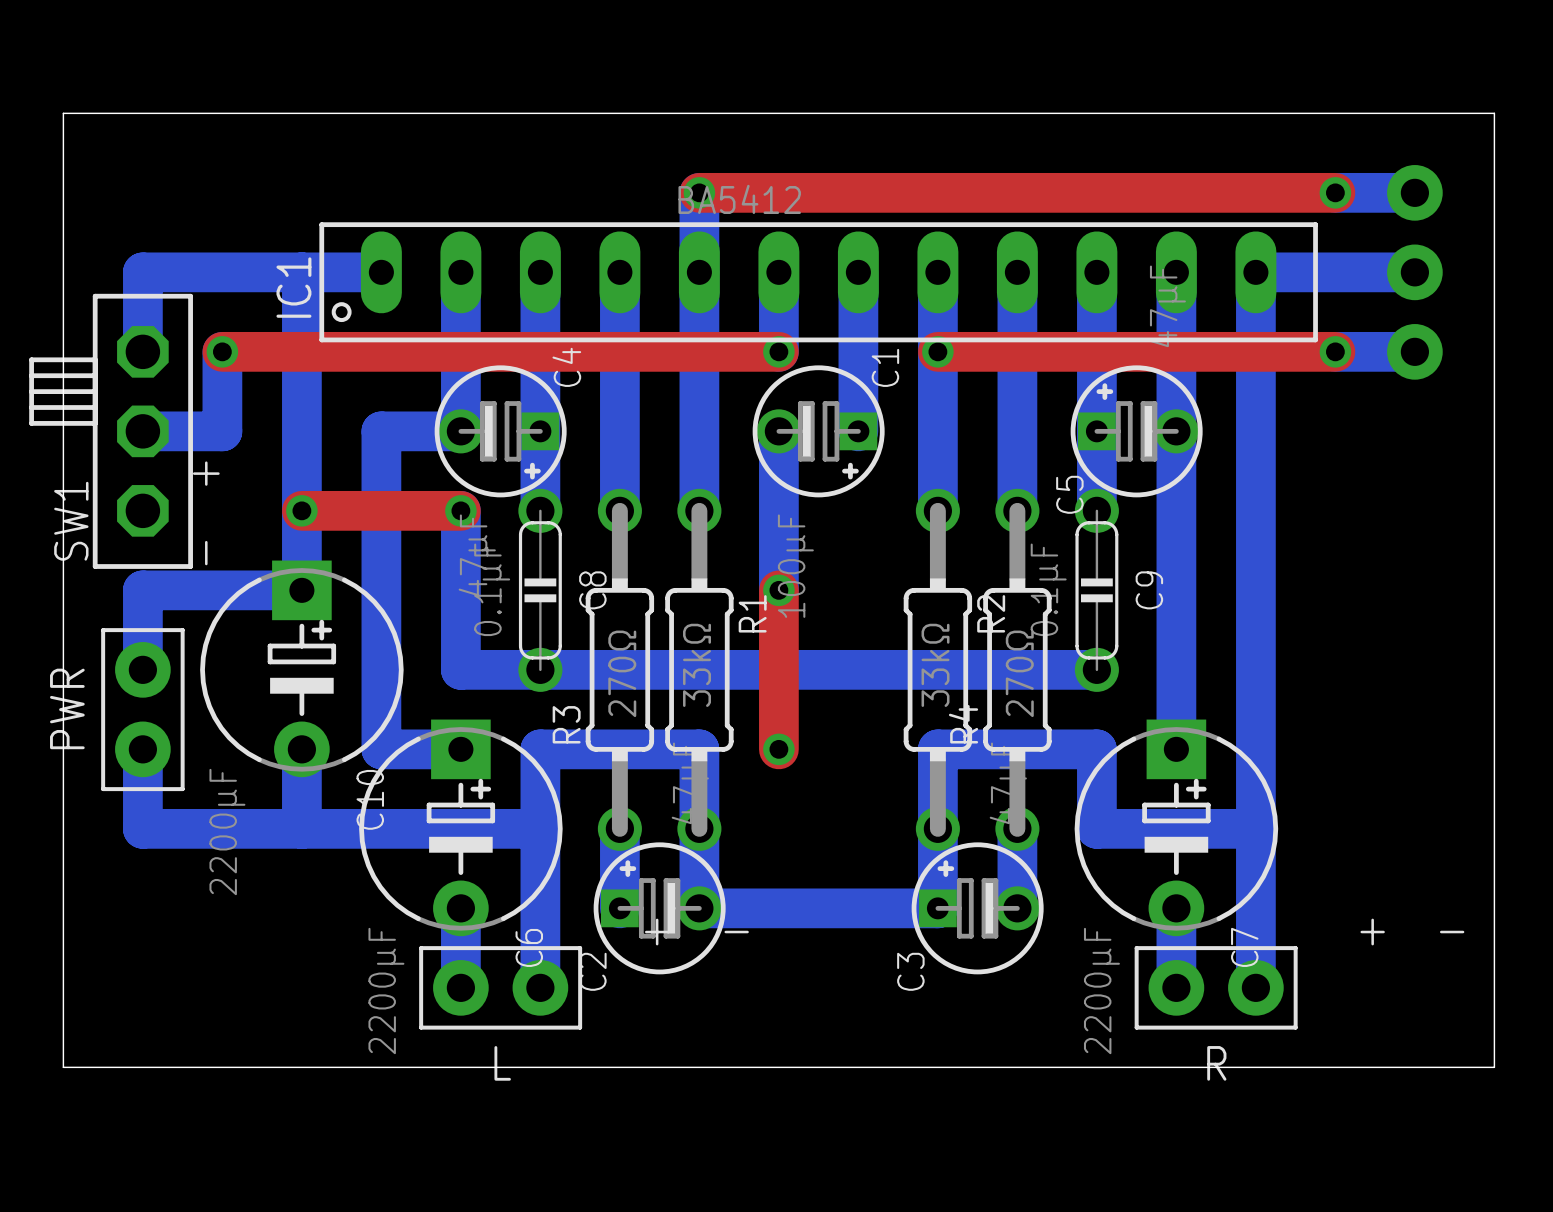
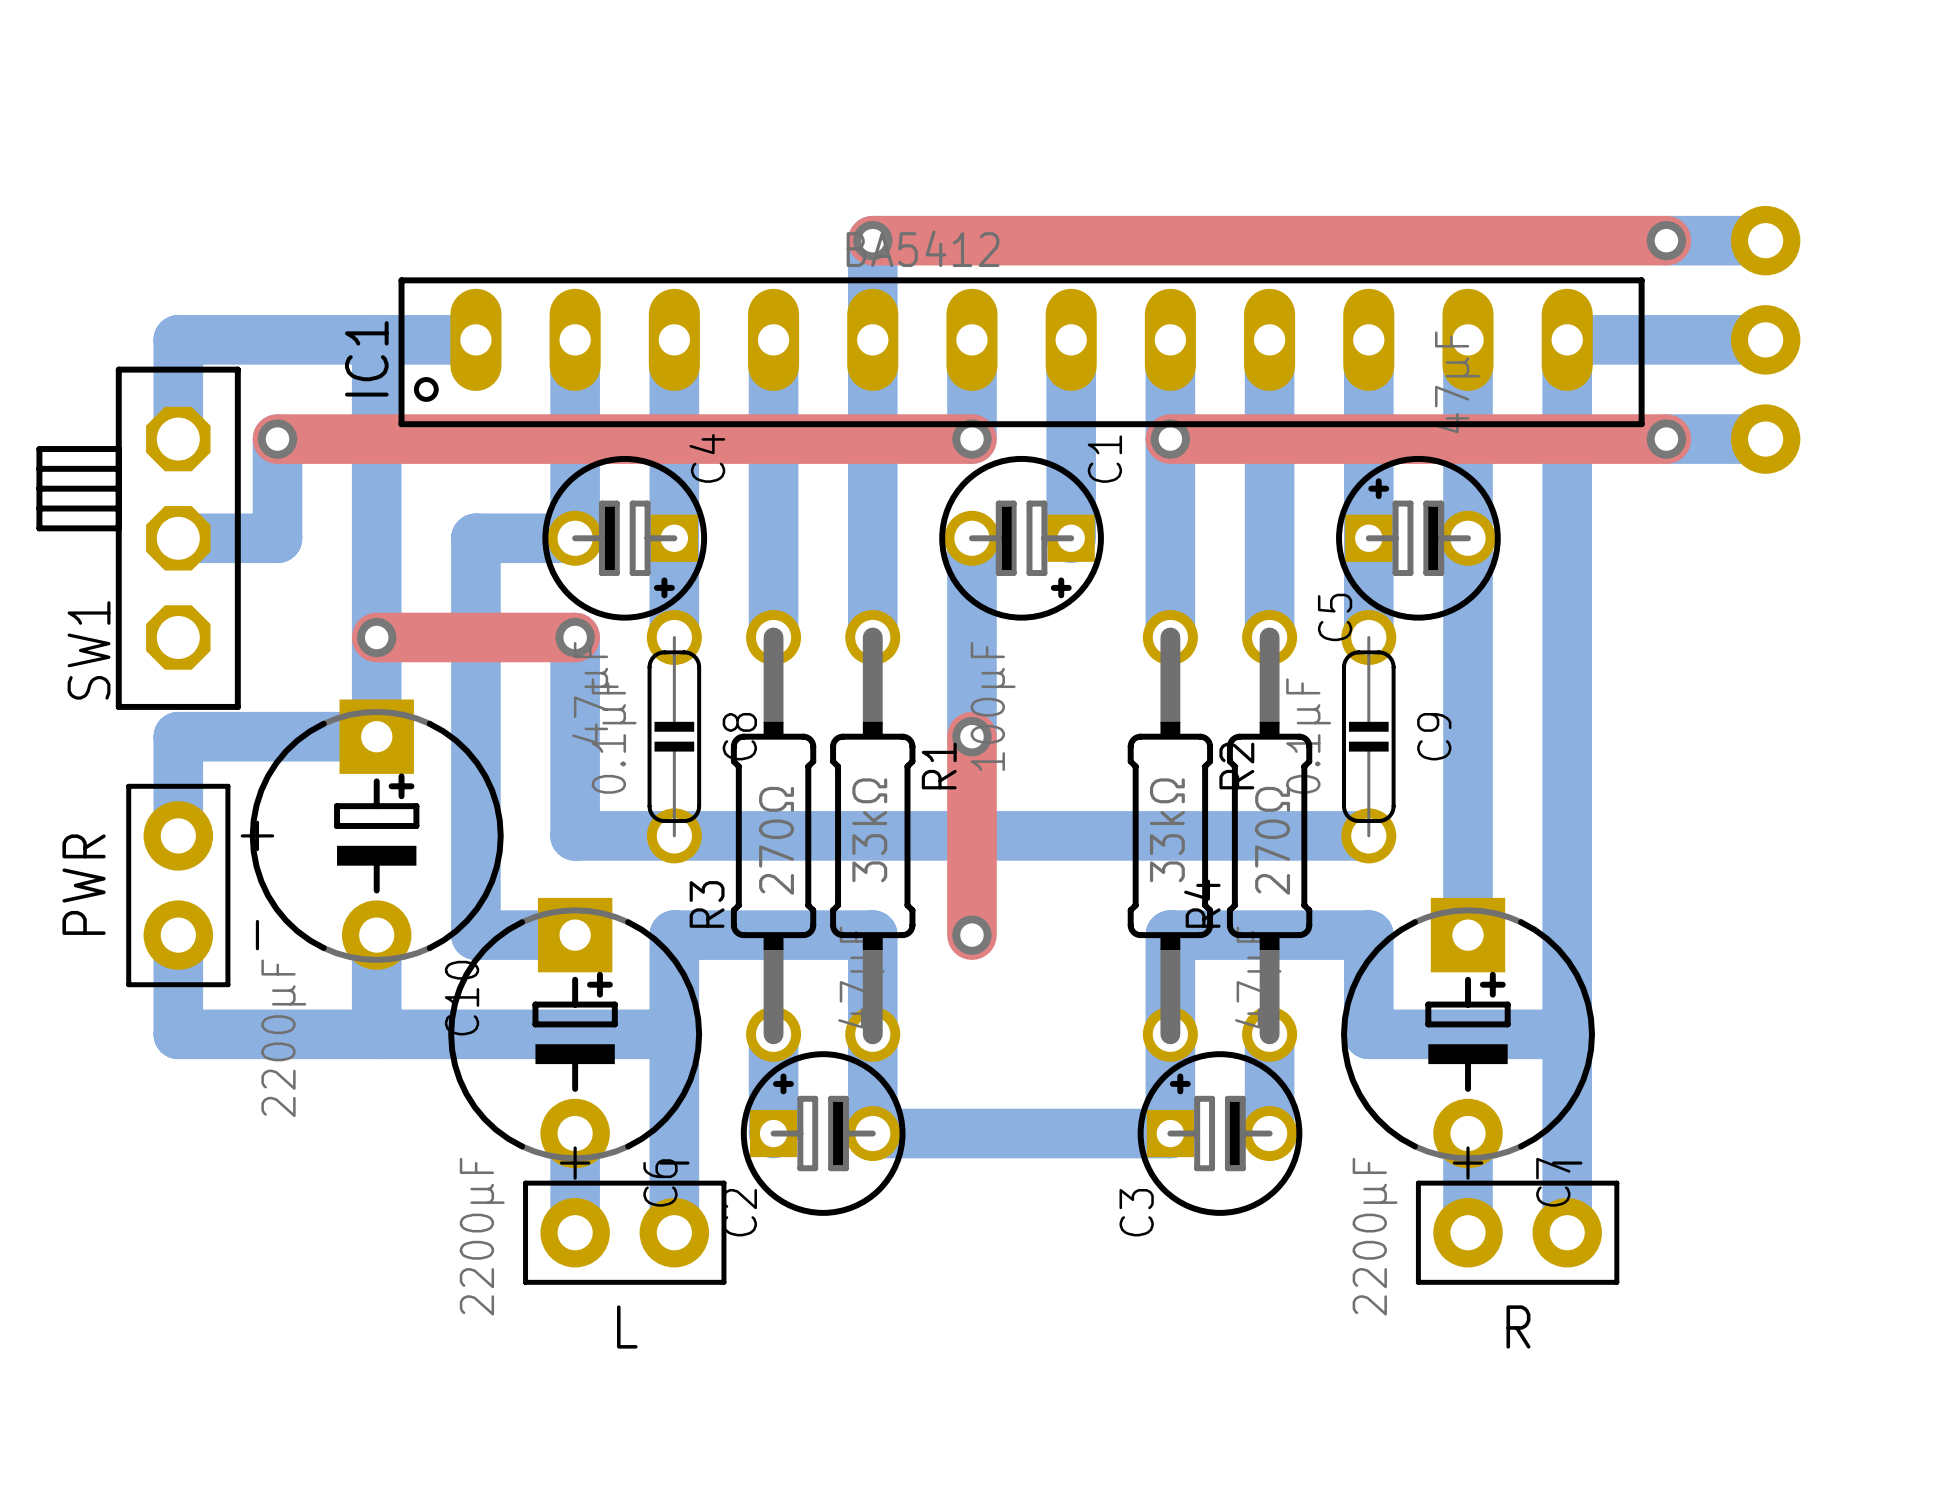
board edge: (63, 113) (1494, 113) (1494, 1067) (63, 1067) (63, 113) -> none
PWR footprint: [101, 628, 185, 792] -> [126, 783, 231, 988]
L footprint: [419, 946, 583, 1030] -> [523, 1180, 727, 1285]
R footprint: [1134, 946, 1298, 1030] -> [1415, 1180, 1620, 1285]

